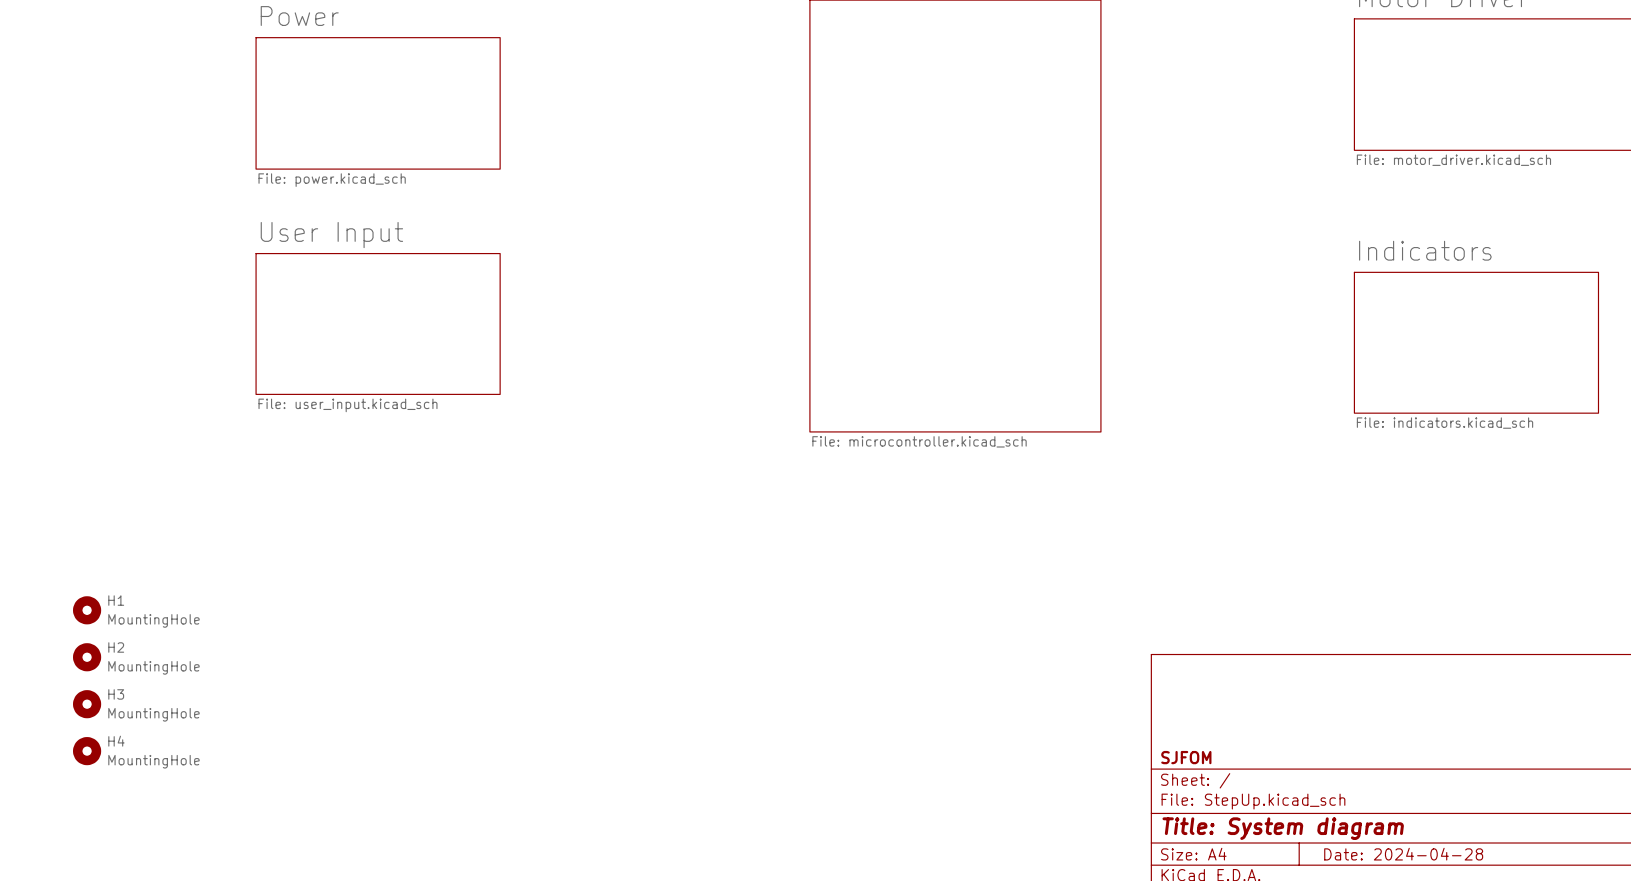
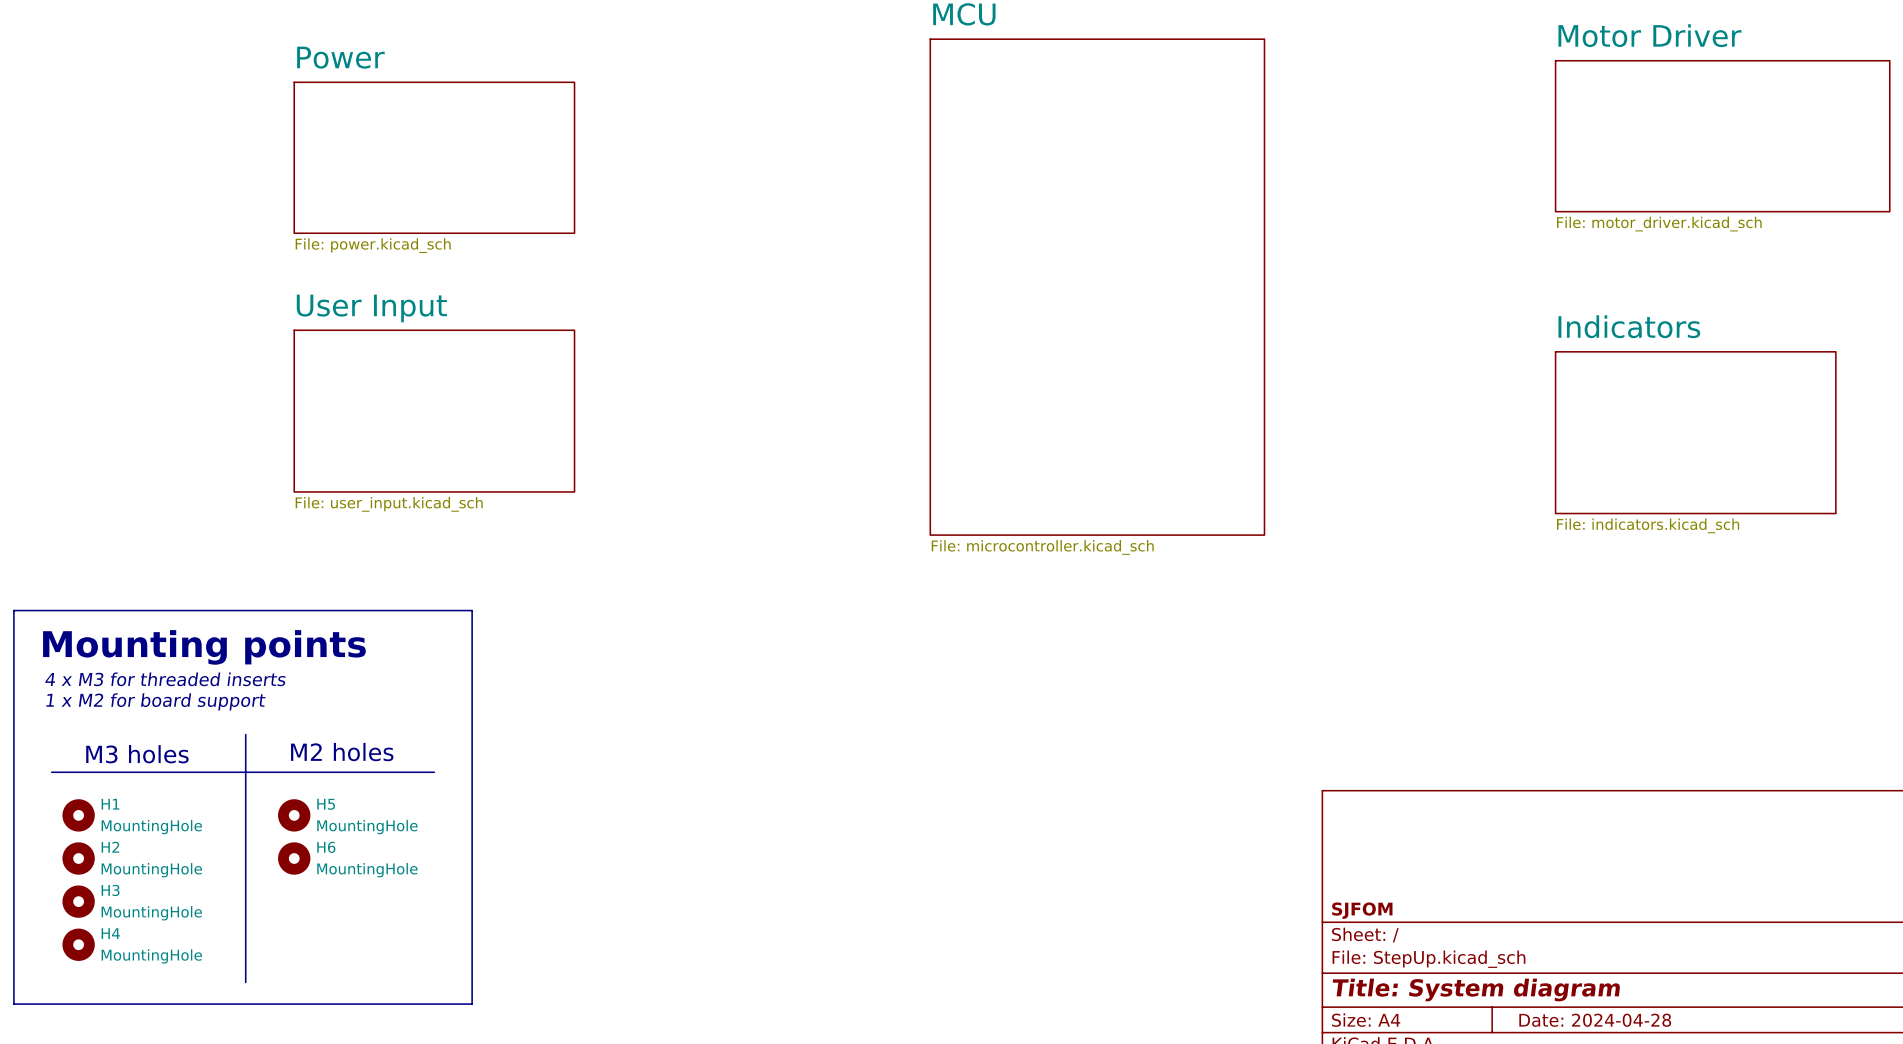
line: none -> (13, 610) (472, 610) (472, 1004) (13, 1004) (13, 610)
text: none -> Mounting points (204, 647)
text: none -> 4 x M3 for threaded inserts (165, 679)
text: none -> 1 x M2 for board support (155, 701)
line: none -> (245, 734) (245, 982)
H1 position: (87, 610) -> (78, 815)
text: none -> M2 holes (342, 752)
text: none -> M3 holes (137, 754)
line: none -> (51, 772) (434, 772)
H2 position: (87, 657) -> (78, 858)
H5: none -> MountingHole (294, 815)
H3 position: (87, 704) -> (78, 901)
H6: none -> MountingHole (294, 858)
H4 position: (87, 751) -> (78, 944)

